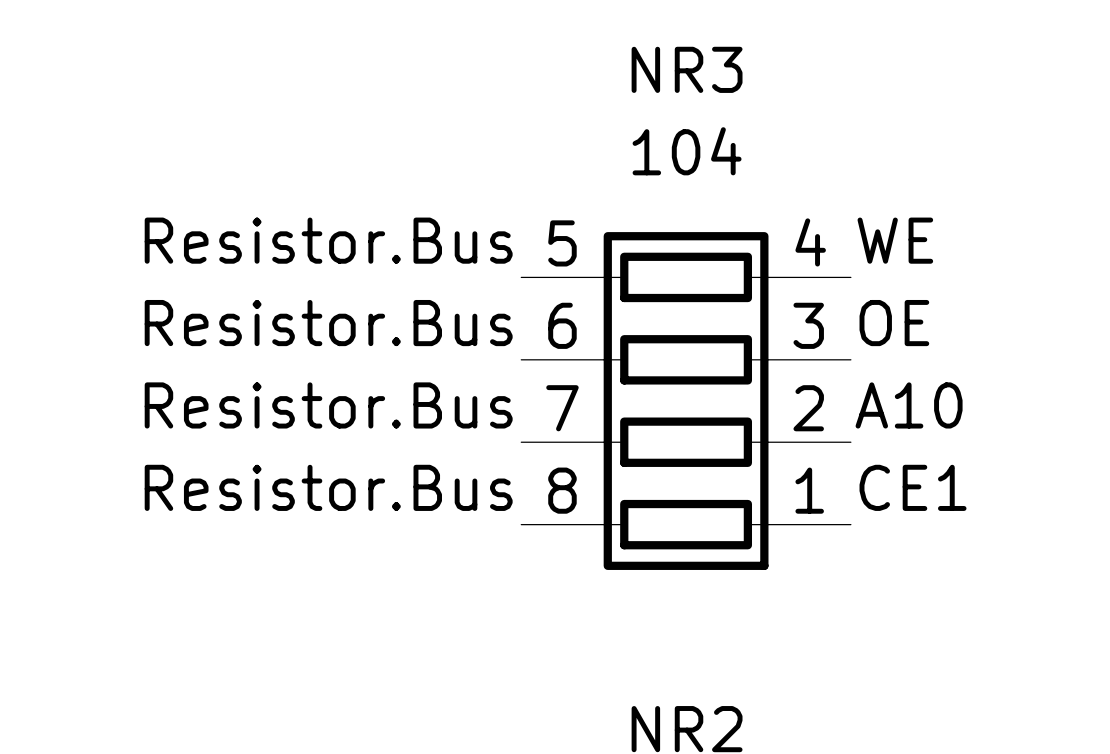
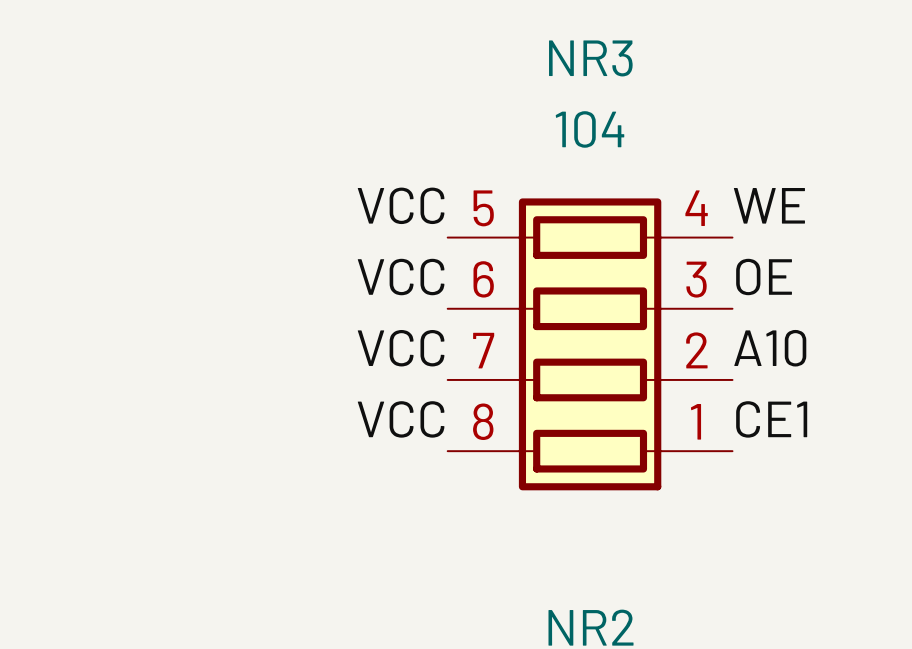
label: Resistor.Bus (328, 240) -> VCC (401, 205)
label: Resistor.Bus (328, 323) -> VCC (401, 277)
label: Resistor.Bus (328, 405) -> VCC (401, 348)
label: Resistor.Bus (328, 487) -> VCC (401, 419)

